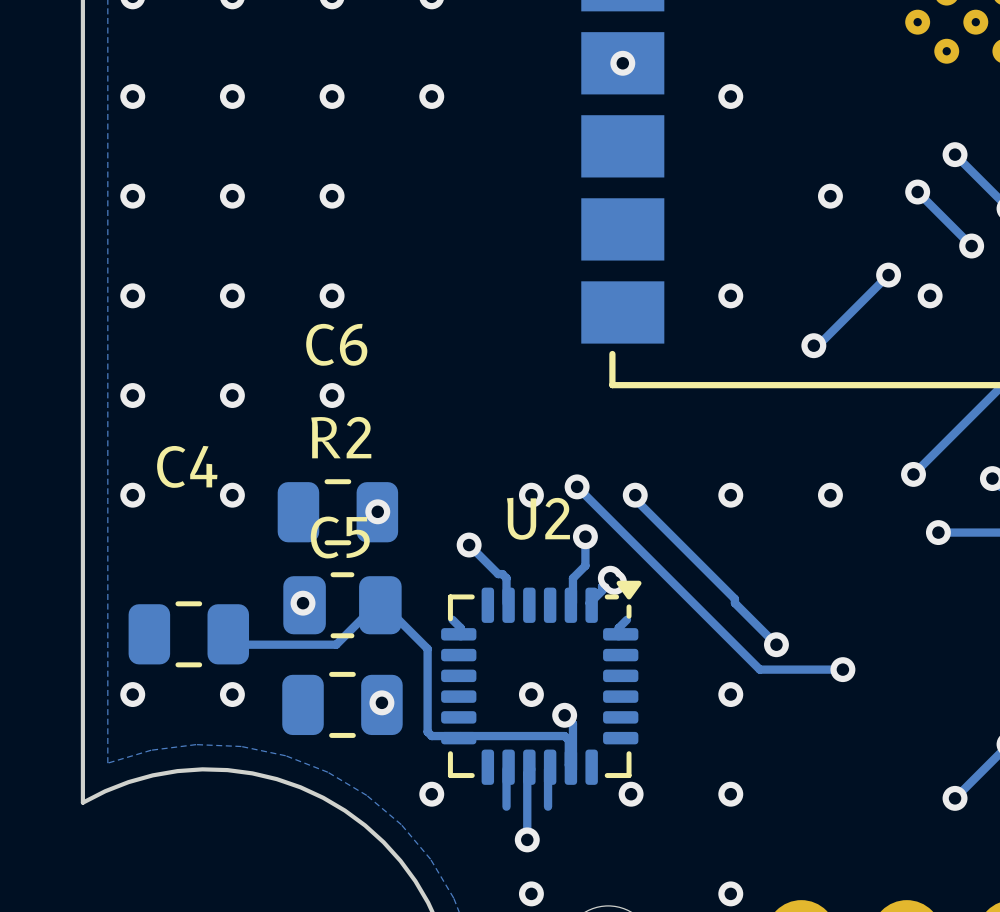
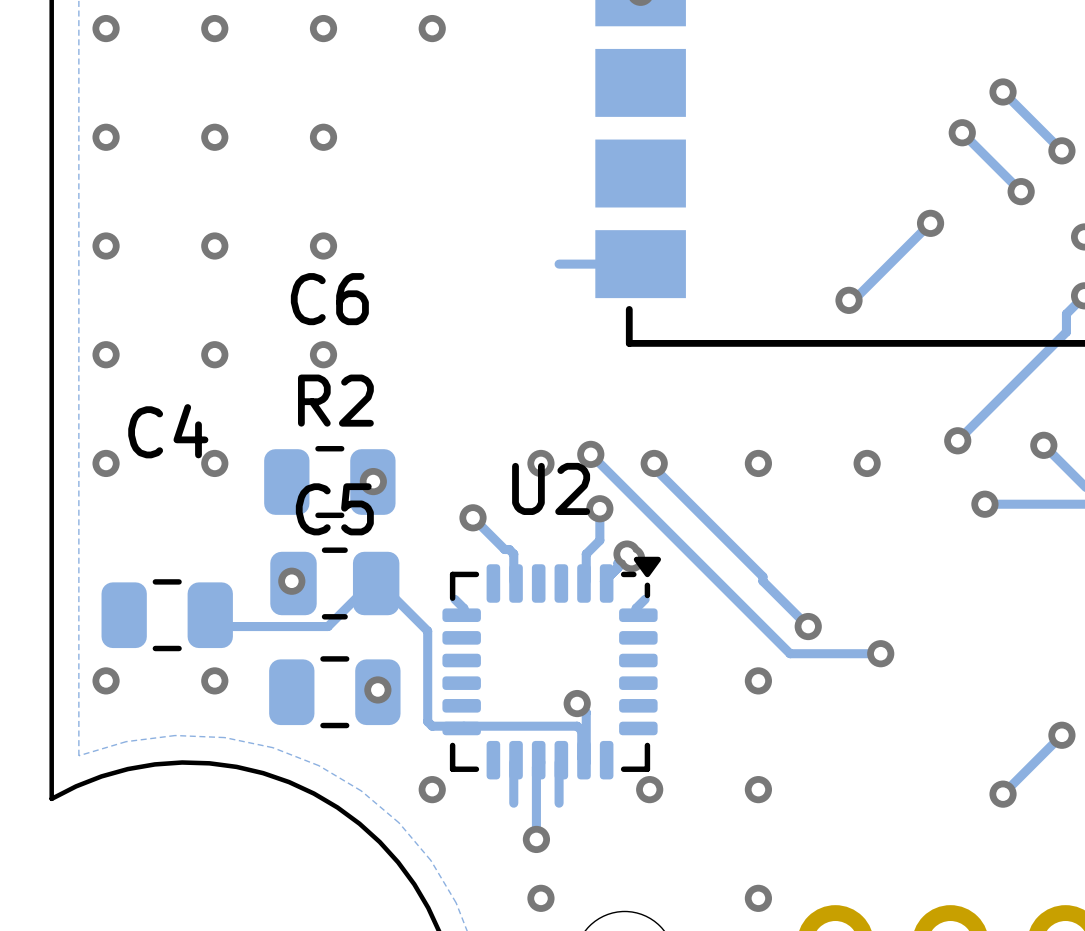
via: (730, 96) -> none
via: (830, 196) -> none
via: (730, 295) -> none
via: (930, 295) -> none
track: none -> (640, 264) (559, 264)
via: (531, 694) -> none

